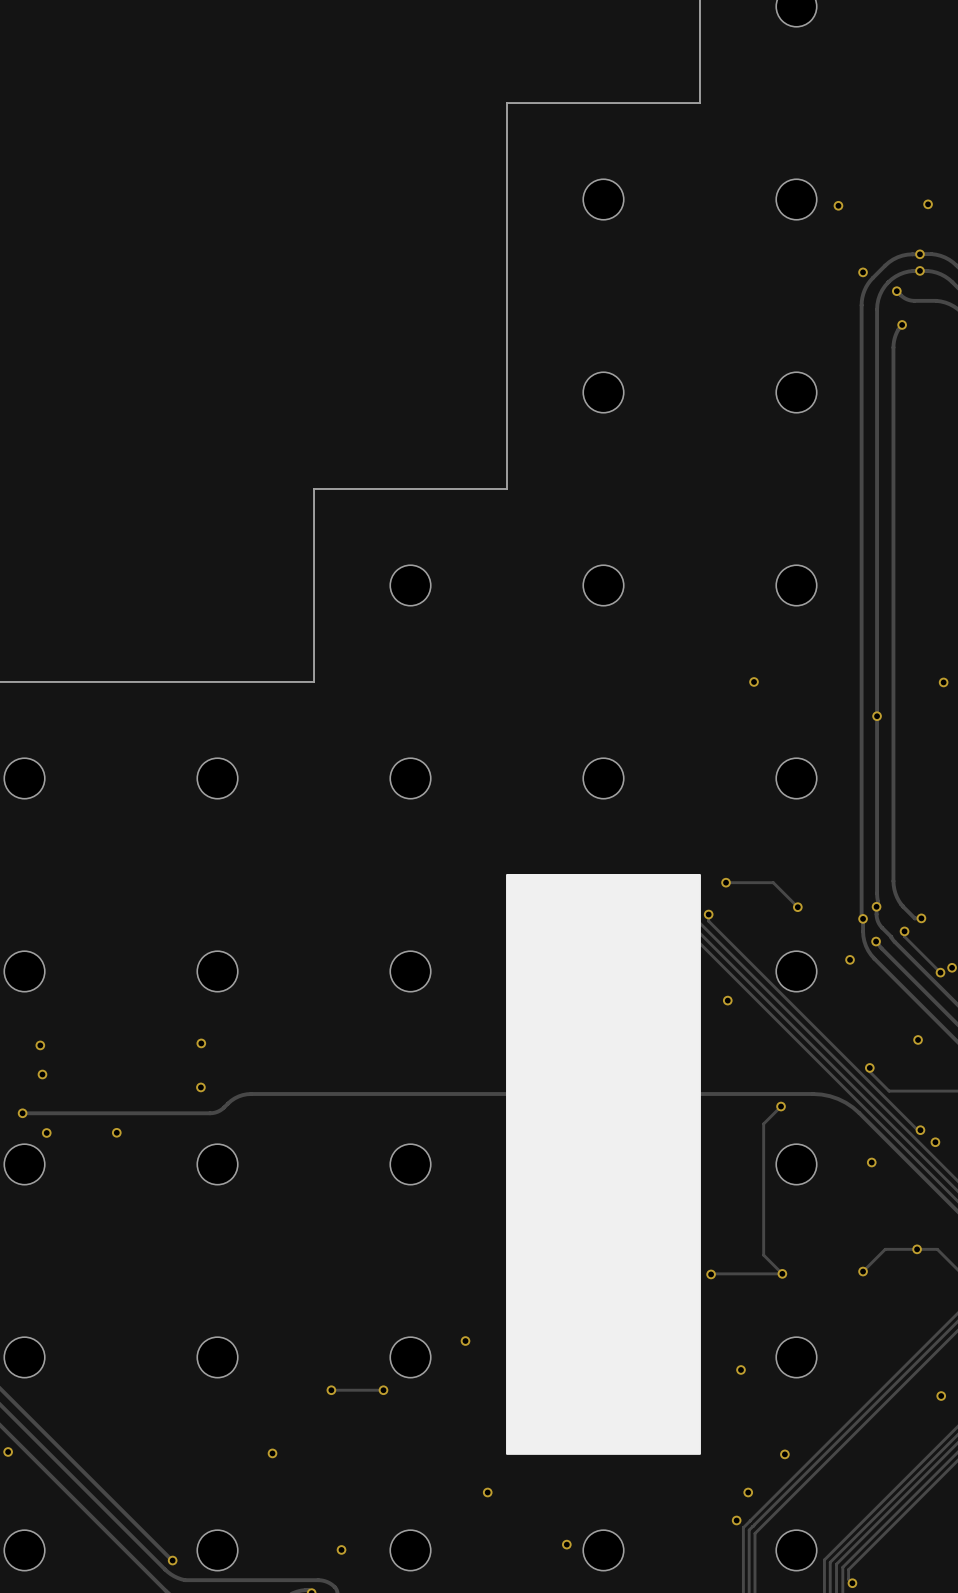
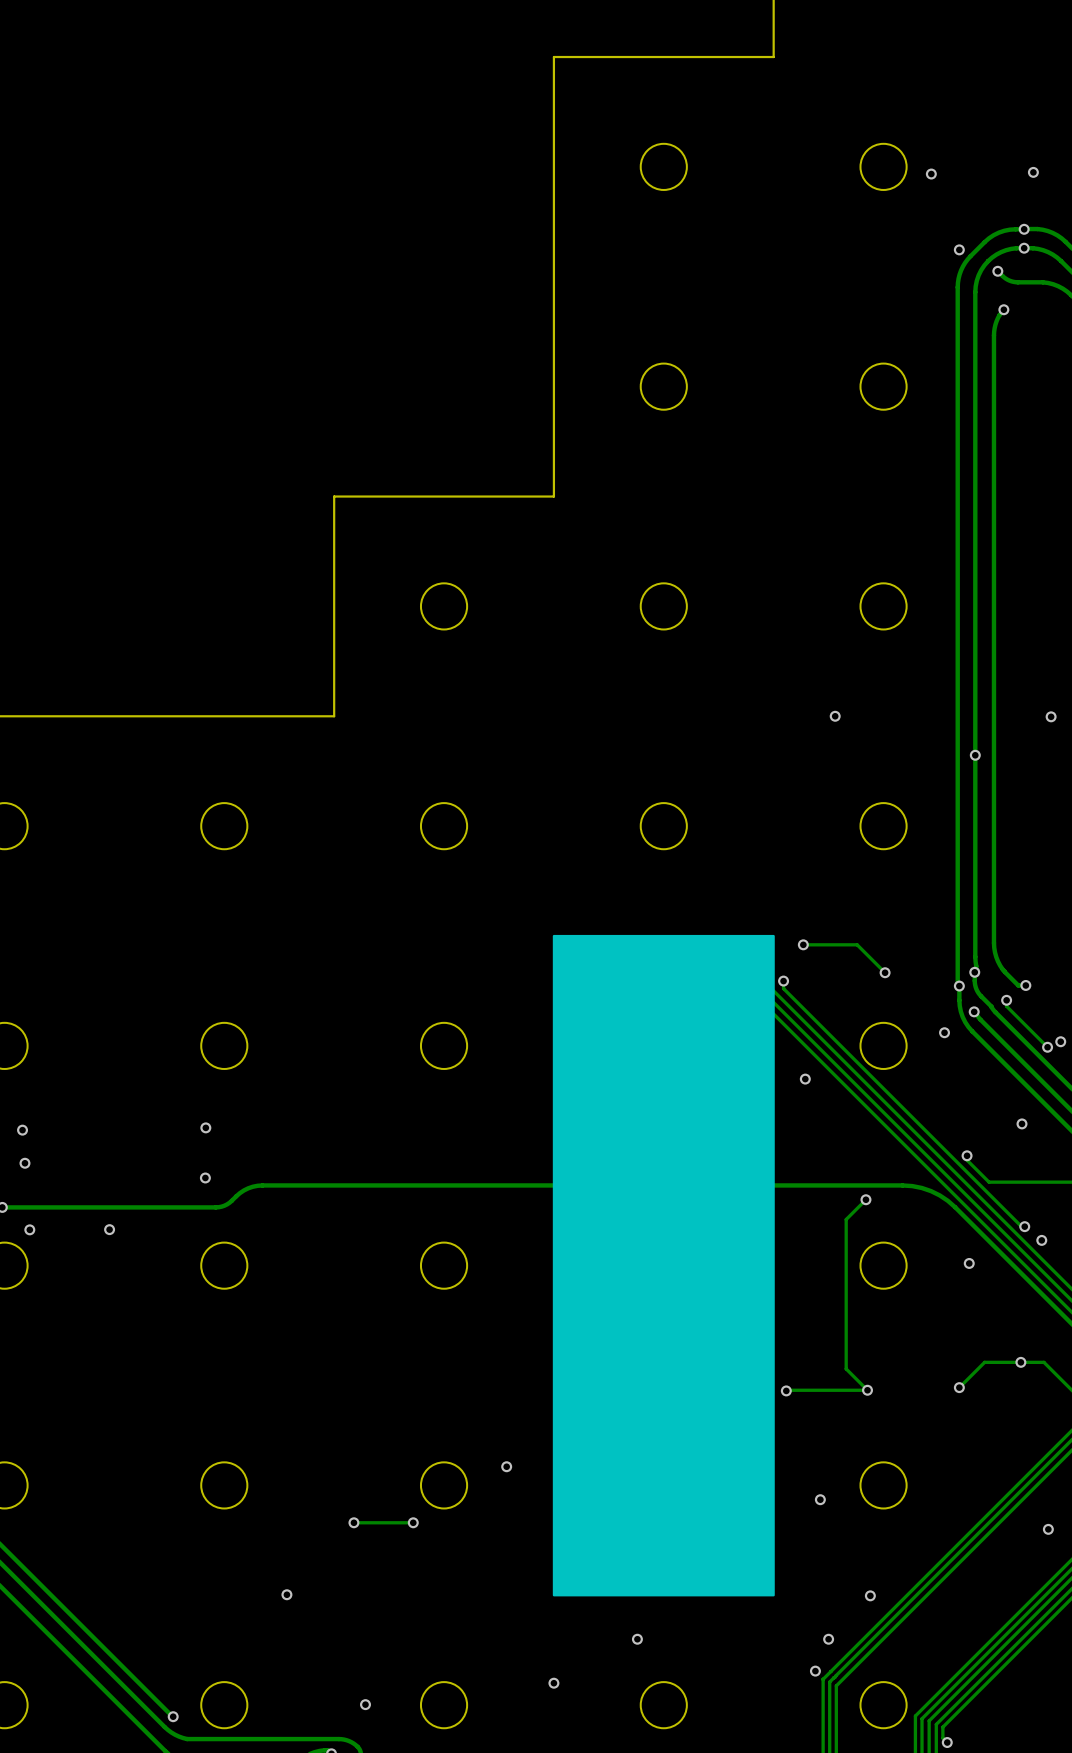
via: (487, 1492) -> none
via: none -> (637, 1639)
via: none -> (553, 1683)
via: (566, 1544) -> none

